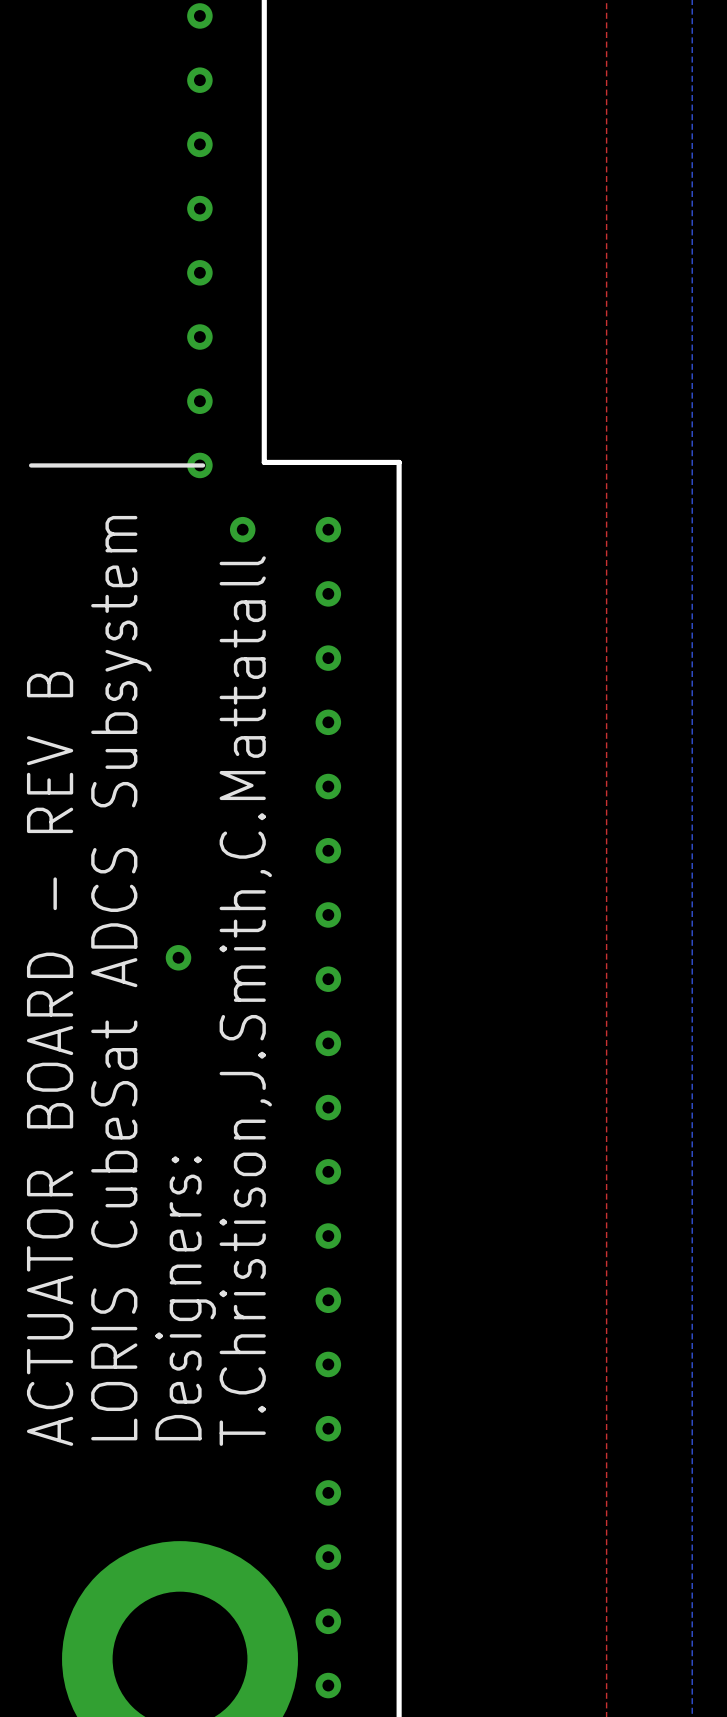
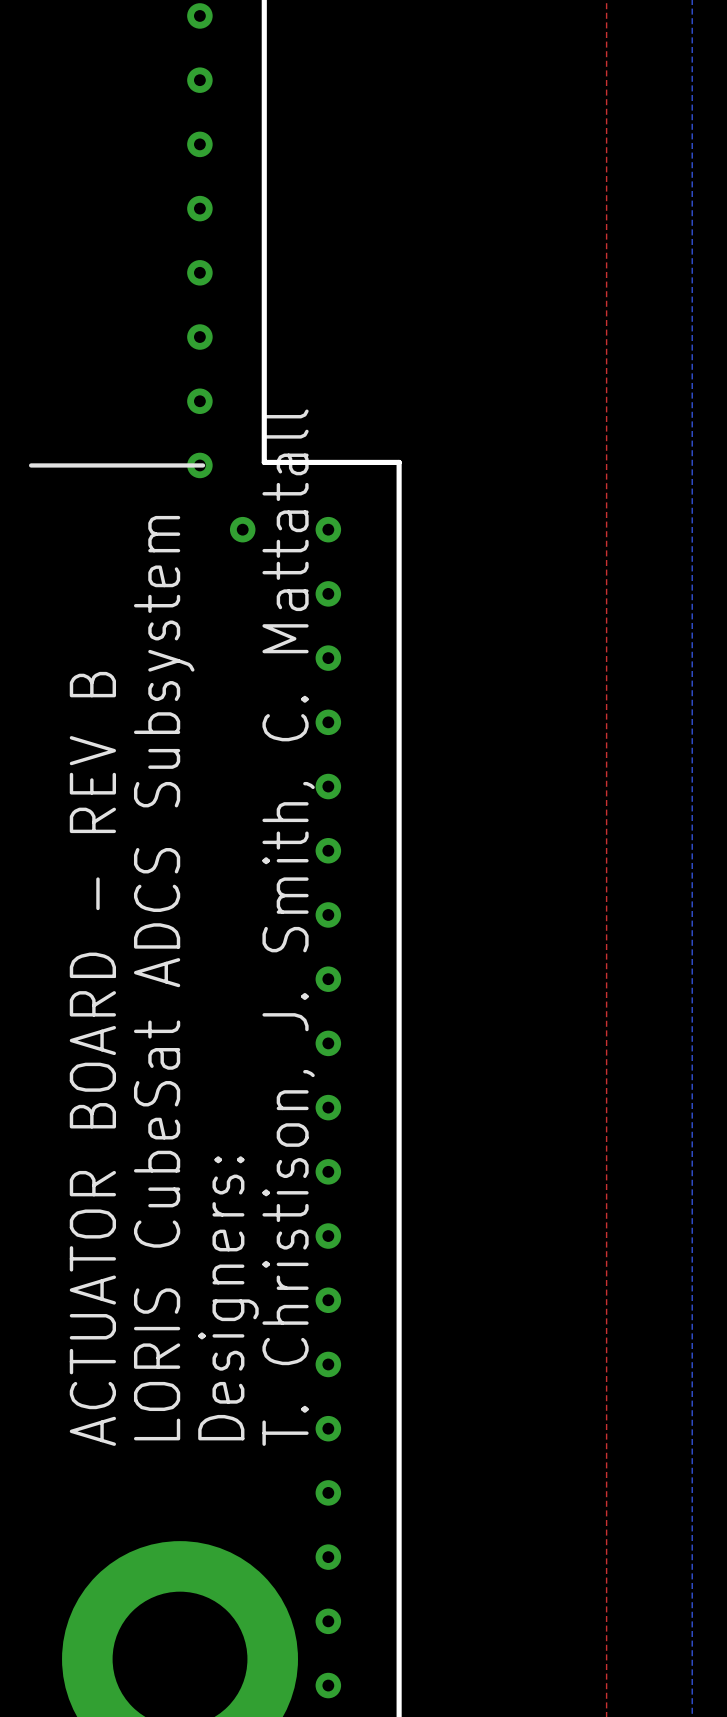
via: (178, 957) -> none
text position: LORIS CubeSat ADCS Subsystem (121, 978) -> LORIS CubeSat ADCS Subsystem (164, 978)
text: T.Christison,J.Smith,C.Mattatall (245, 1001) -> T. Christison, J. Smith, C. Mattatall (288, 927)
text position: ACTUATOR BOARD - REV B (50, 1058) -> ACTUATOR BOARD - REV B (92, 1058)
text position: Designers: (185, 1298) -> Designers: (228, 1298)

